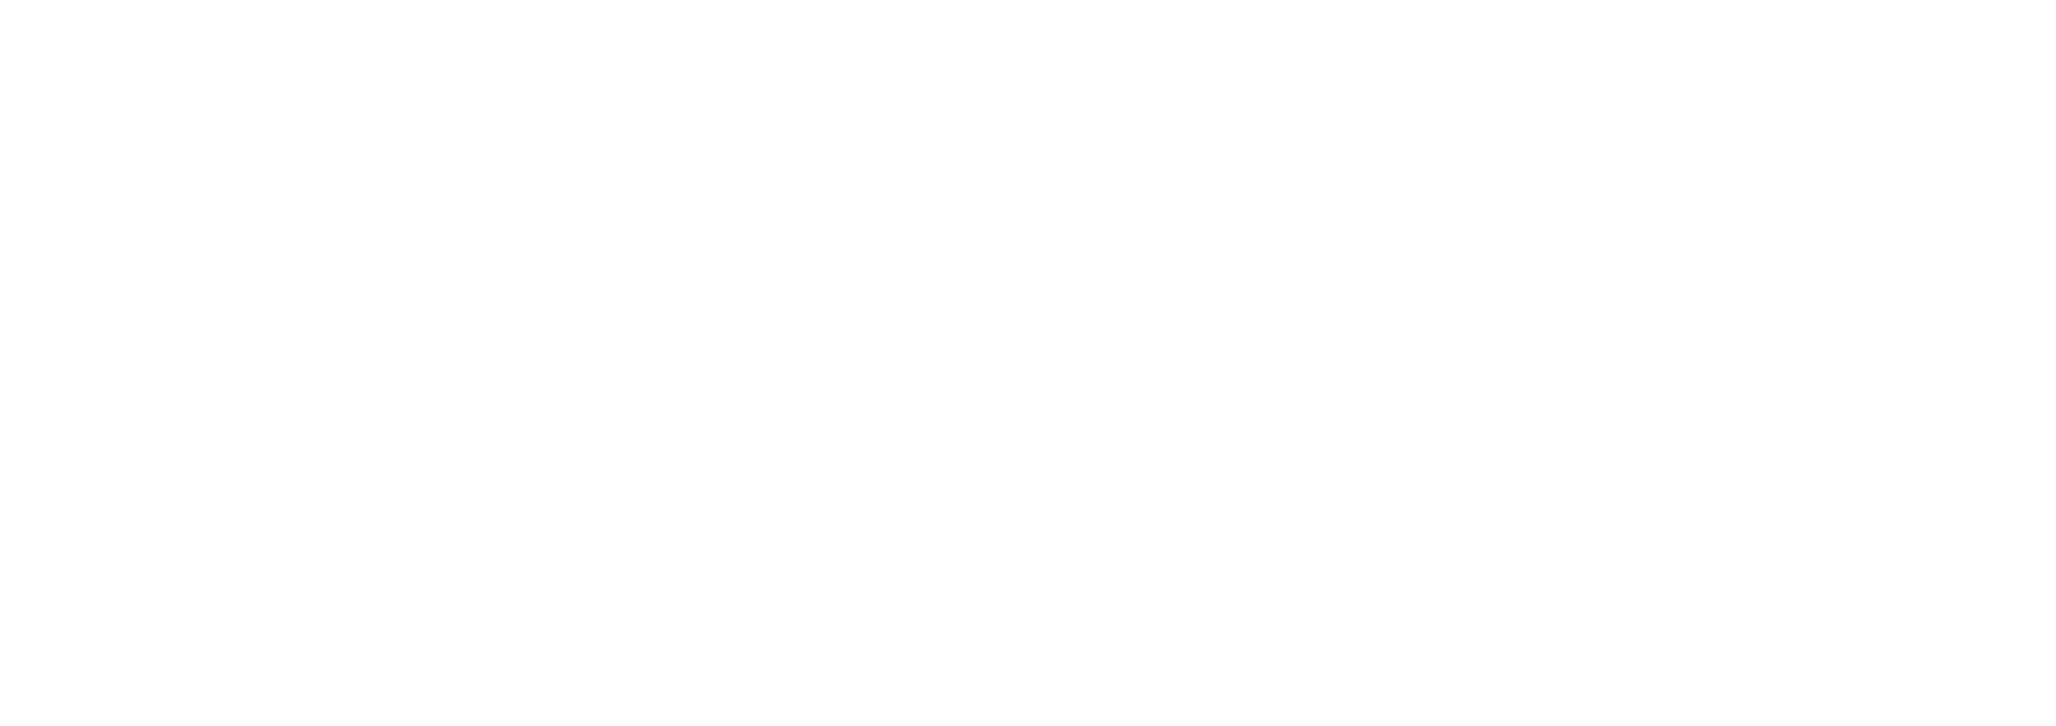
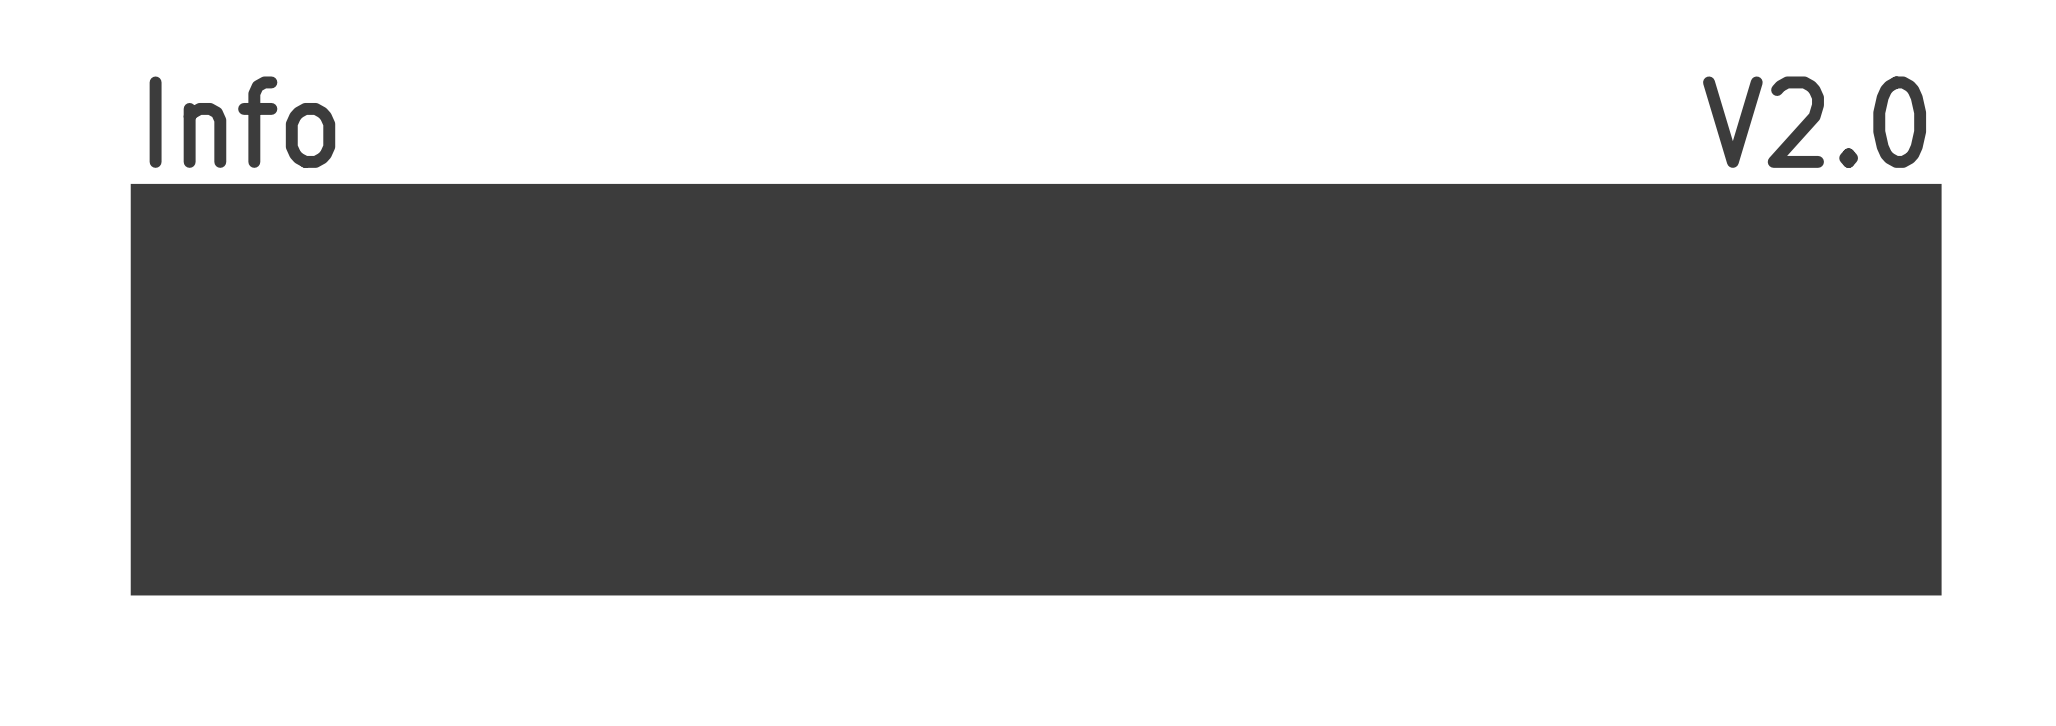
text: none -> Info (242, 122)
text: none -> V2.0 (1814, 122)
drawing: none -> [130, 183, 1942, 596]

